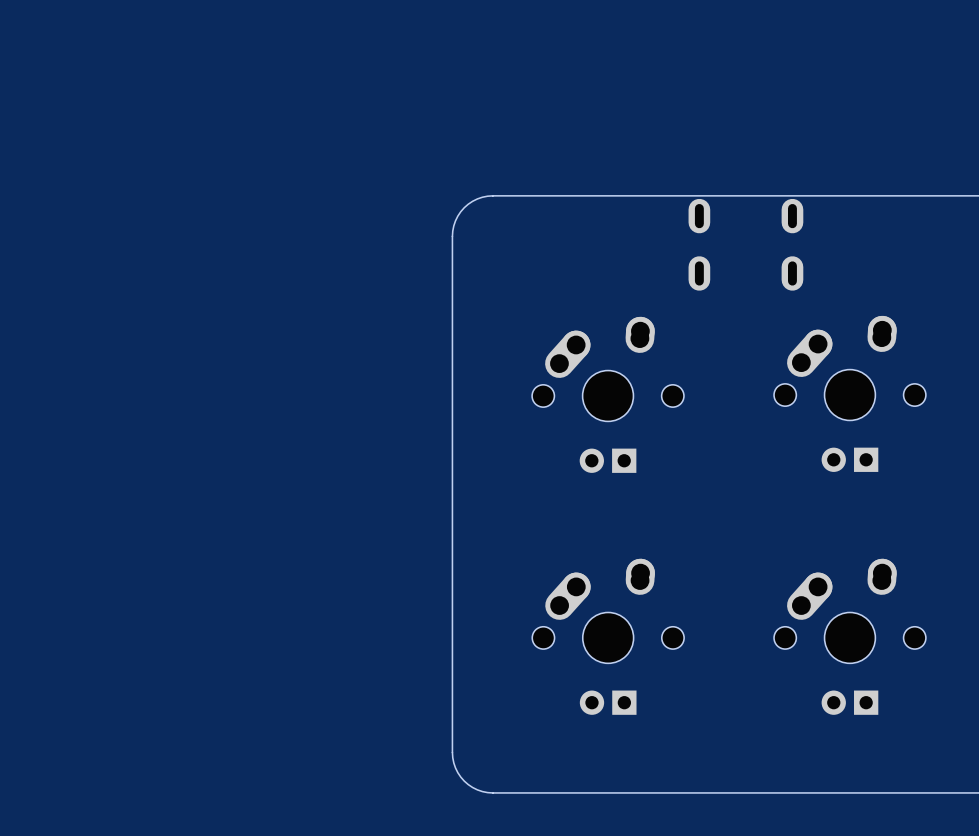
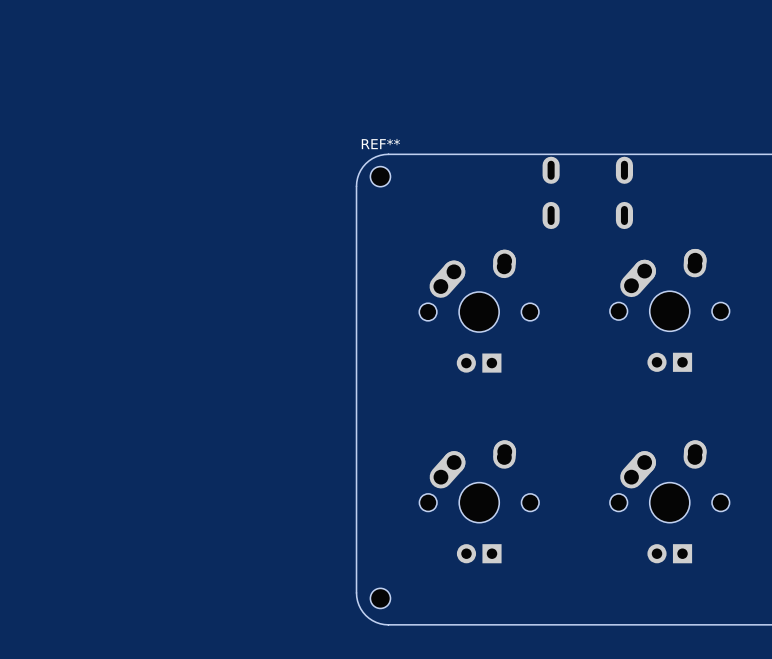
REF**: none -> (380, 176)
part: none -> (380, 598)

